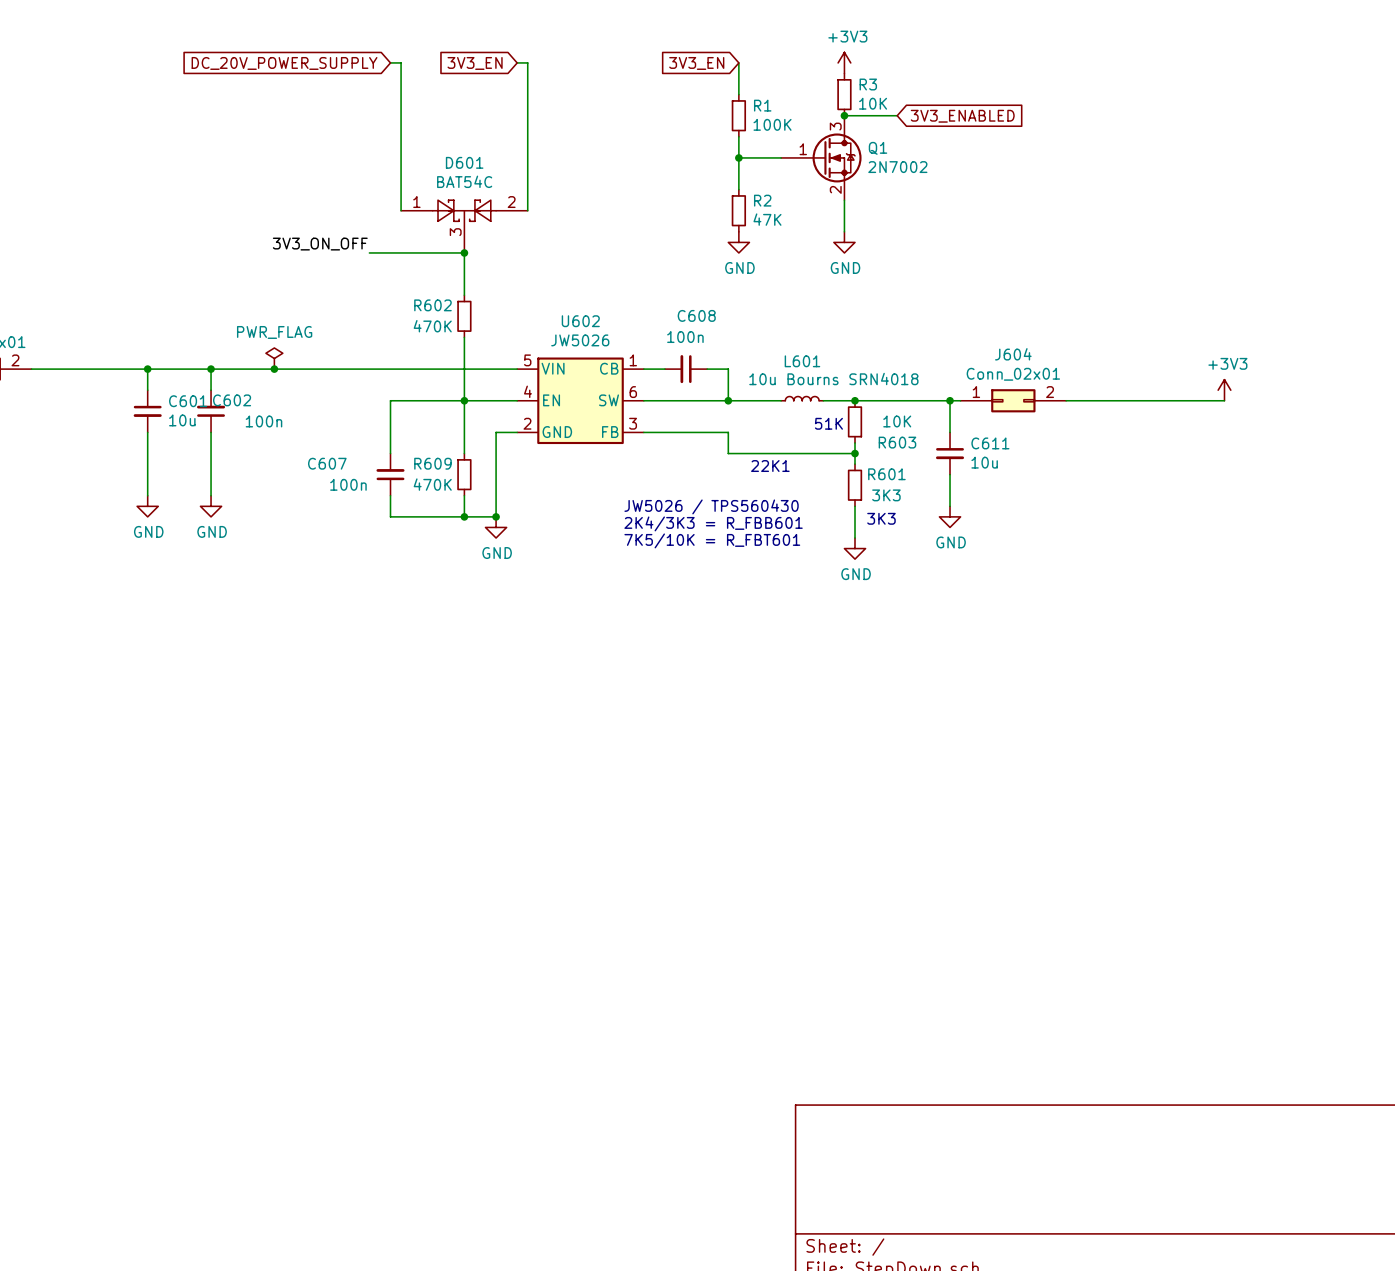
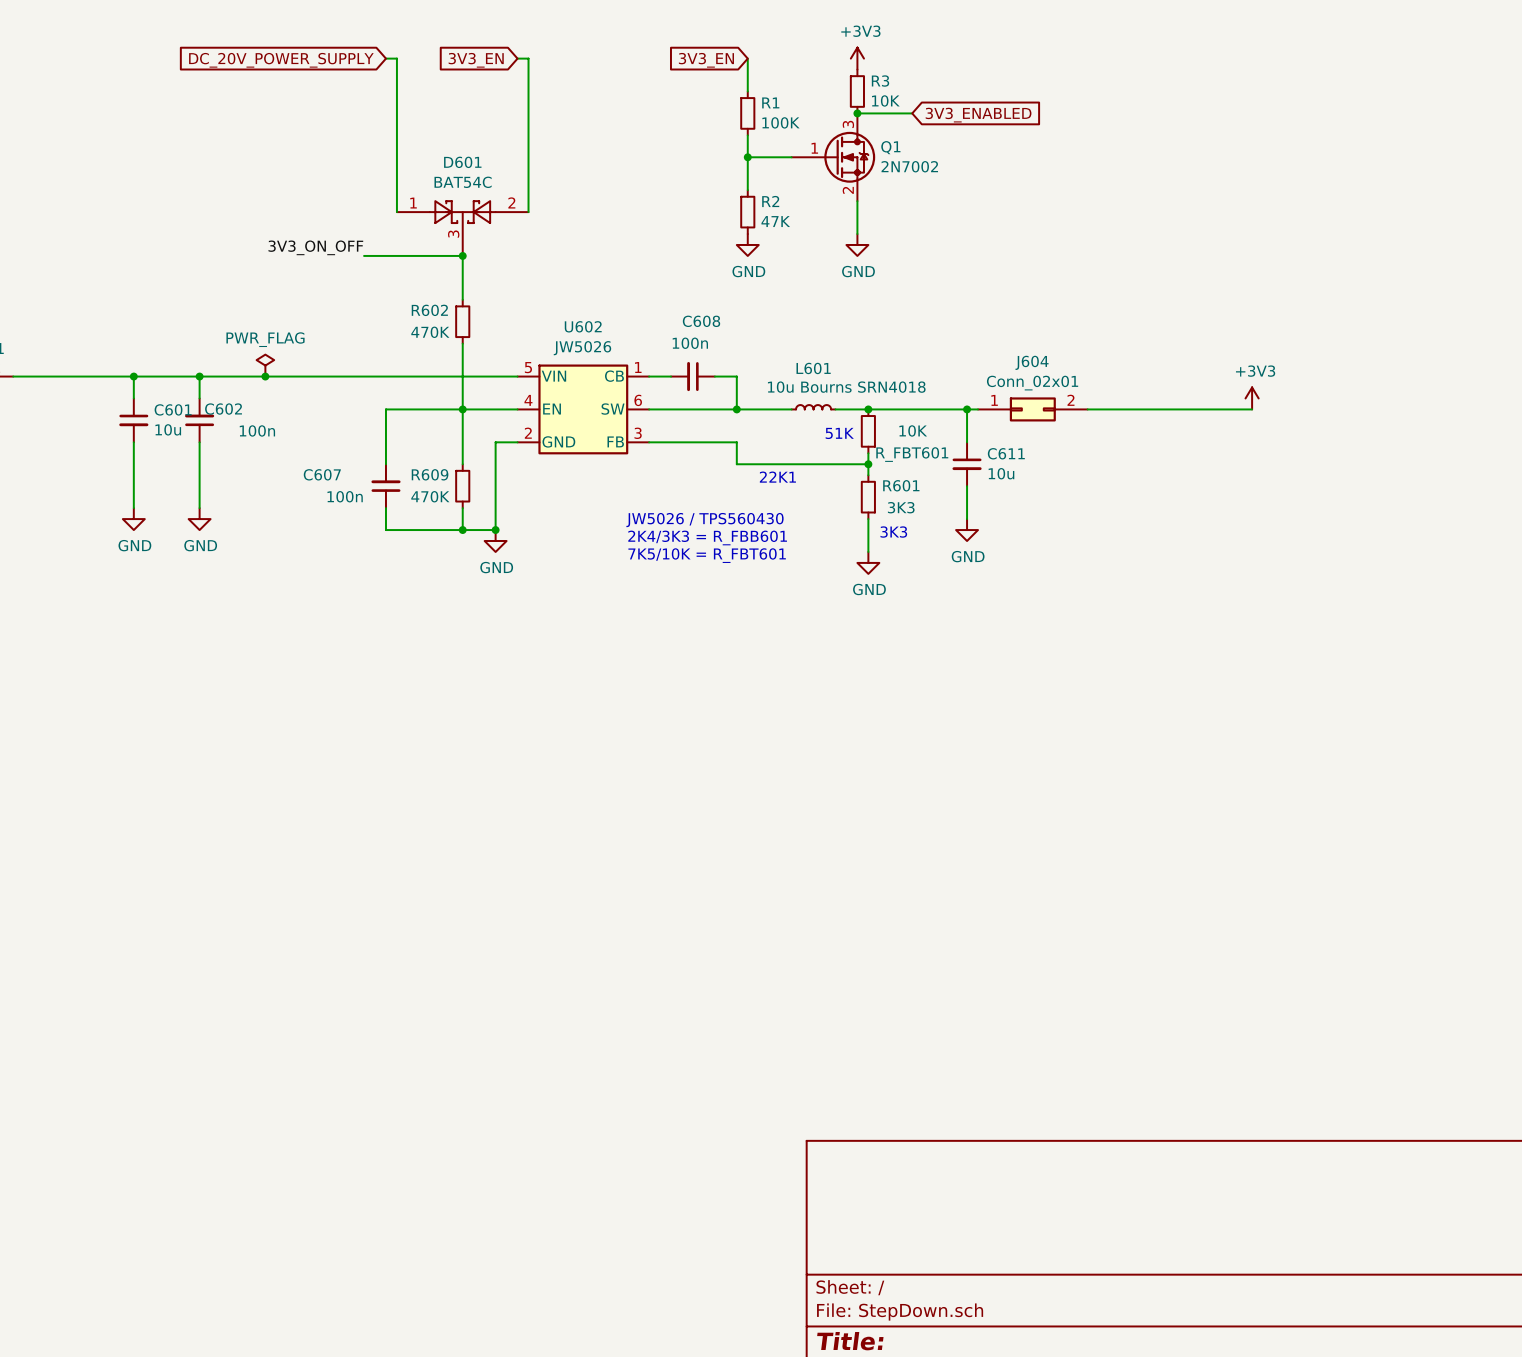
R603 name: R603 (897, 442) -> R_FBT601 (912, 454)

